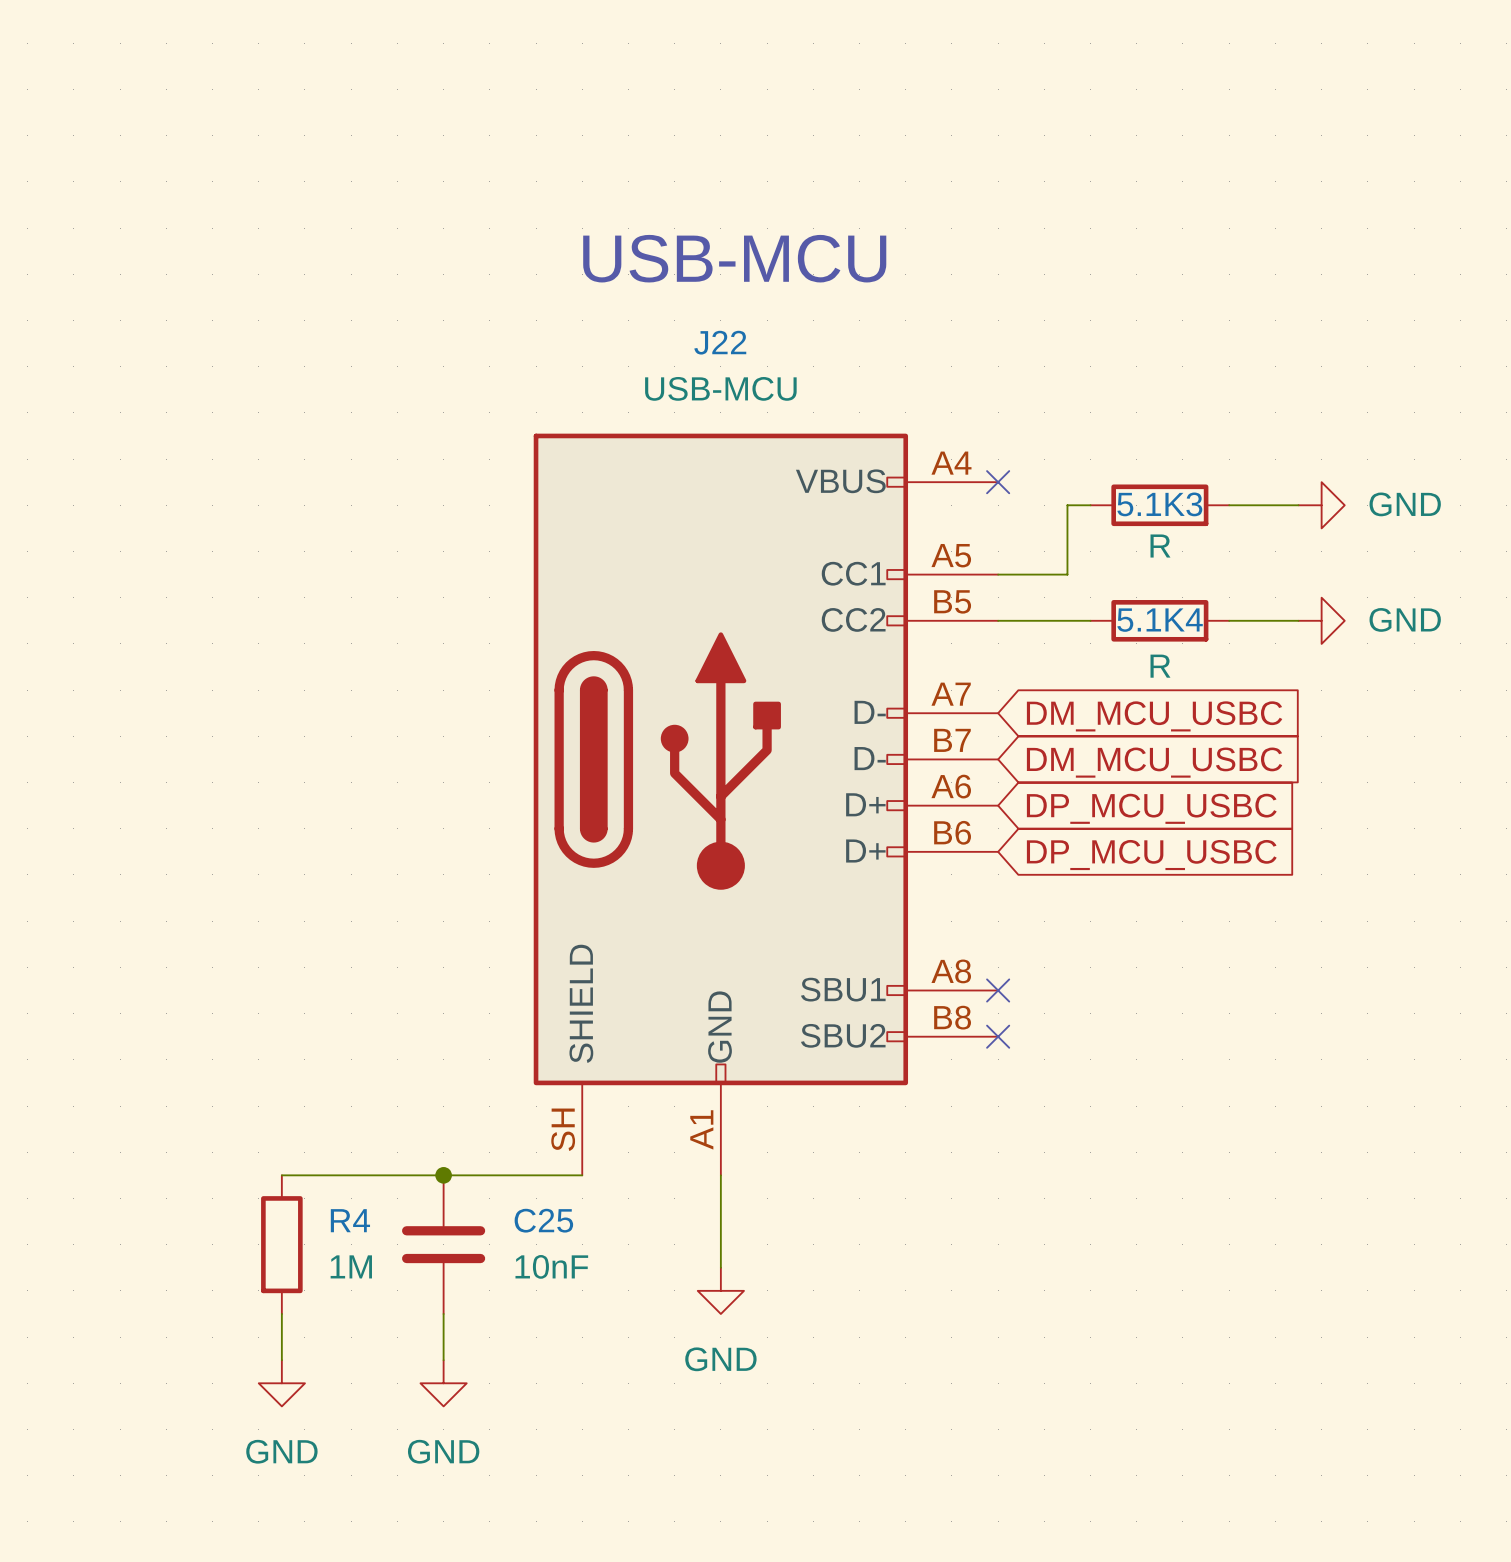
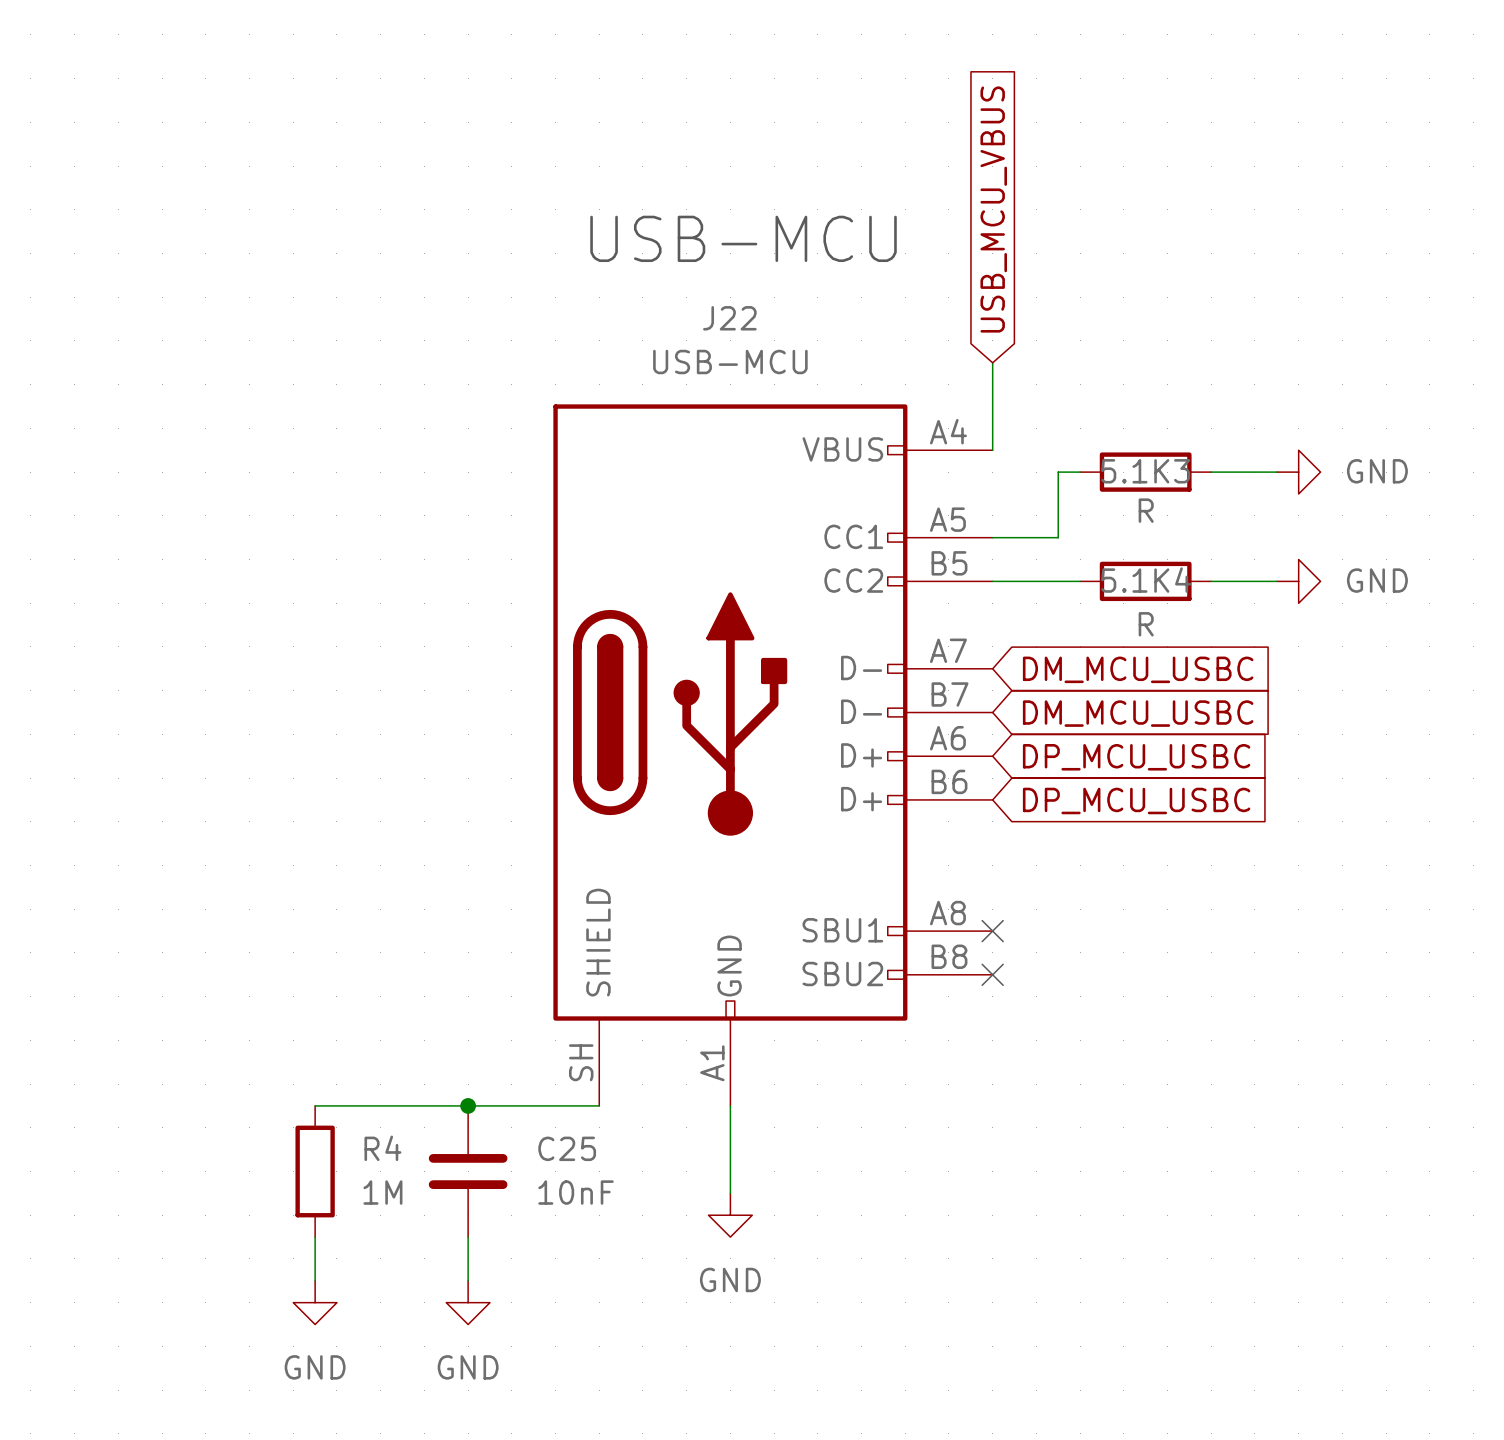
global label: none -> USB_MCU_VBUS (993, 209)
wire: none -> (992, 362) (992, 450)
no-connect mark: (998, 482) -> none

